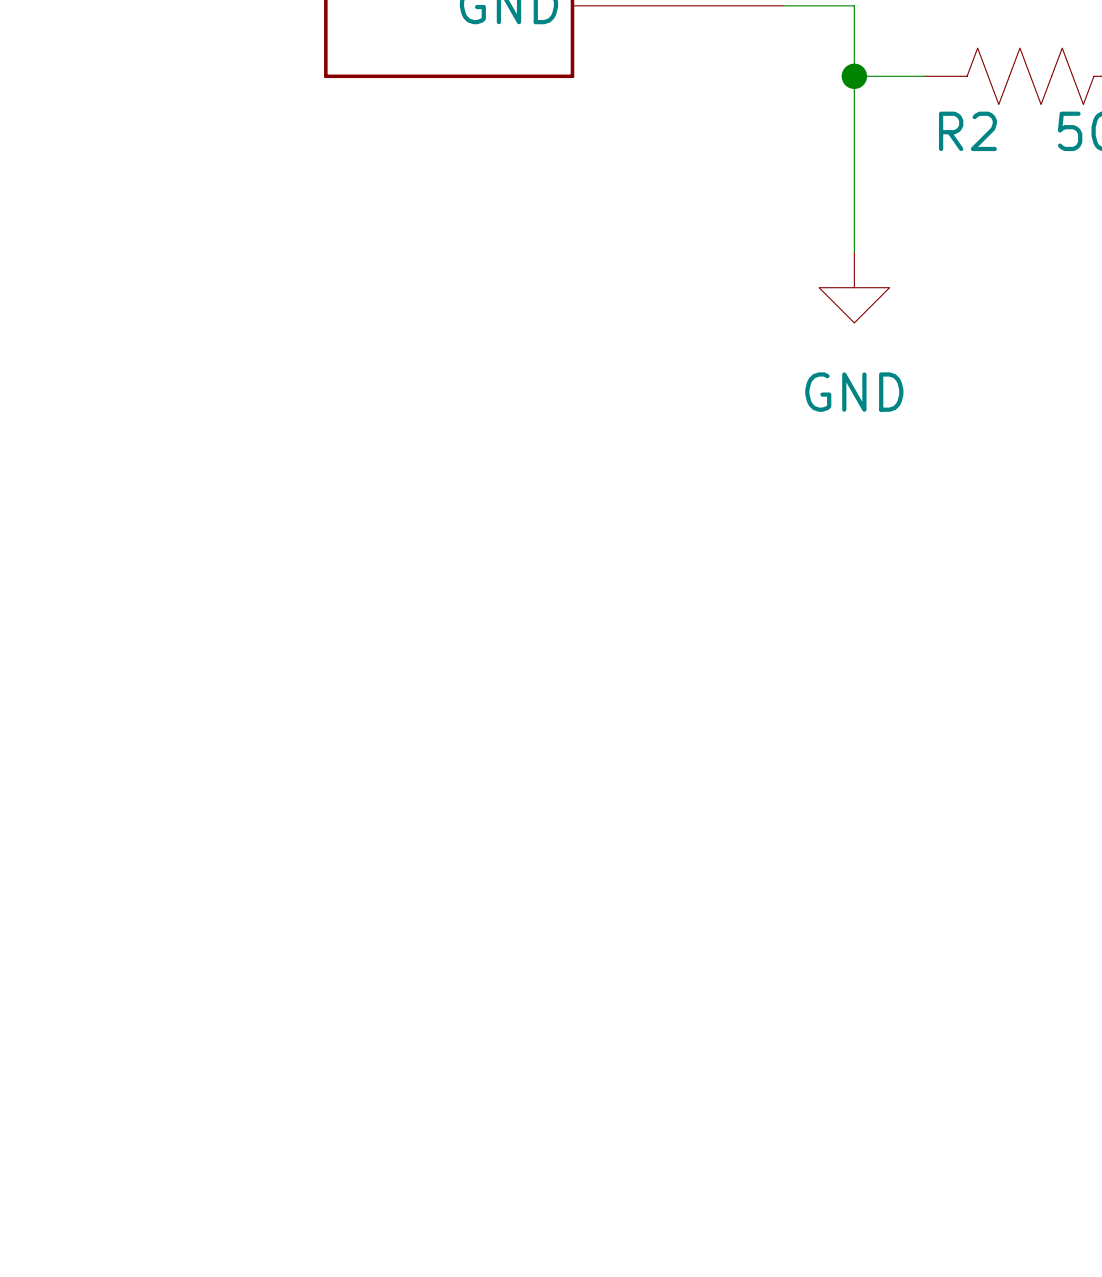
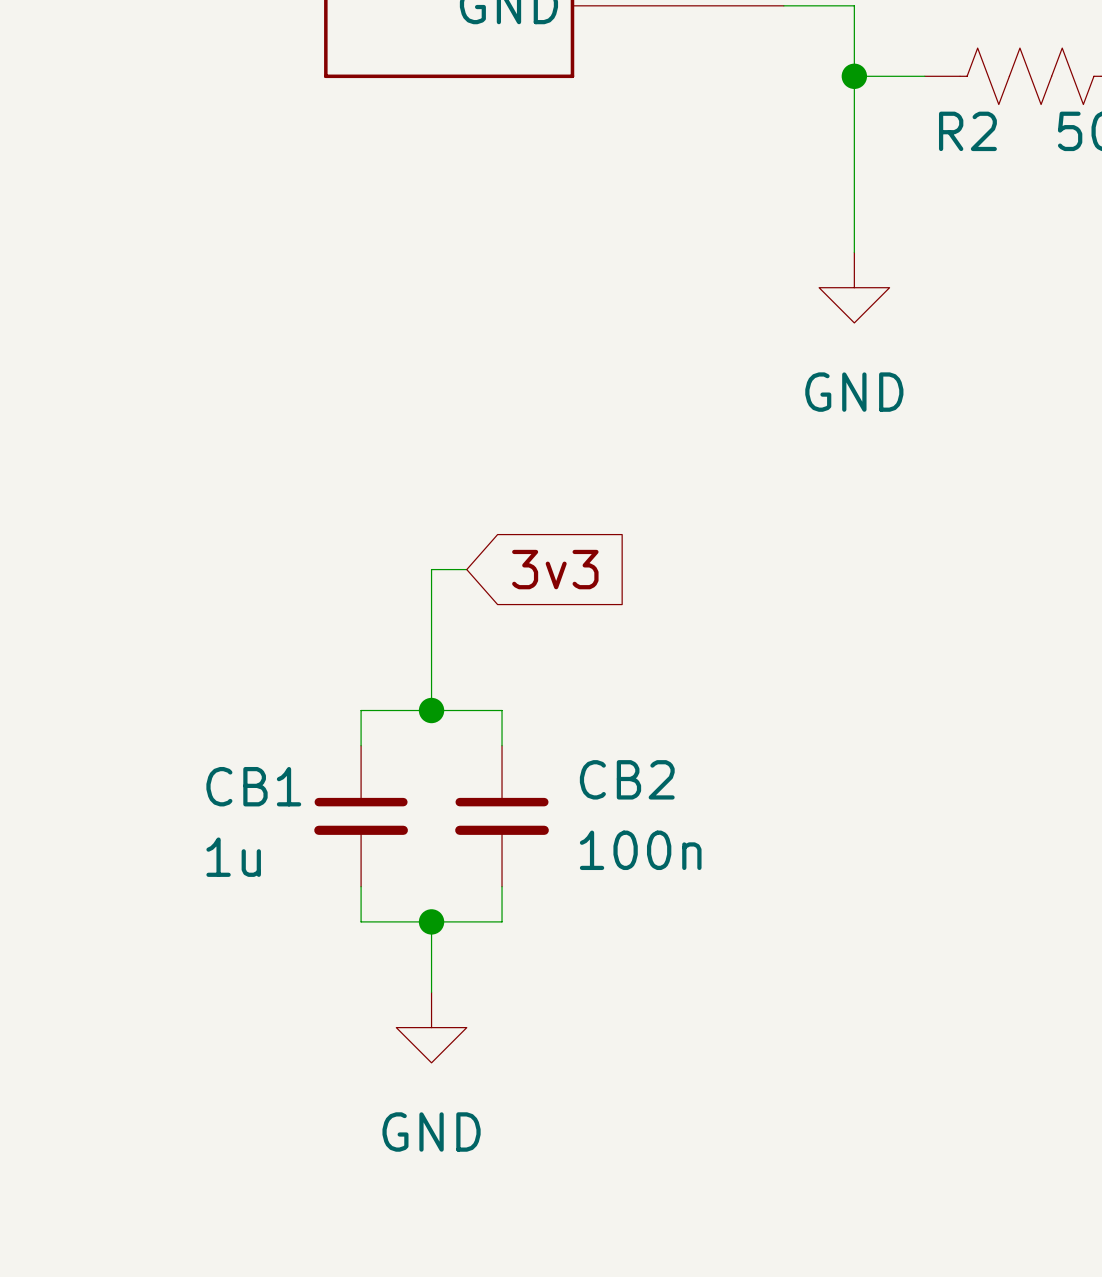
wire: none -> (466, 569) (431, 569) (431, 710)
global label: none -> 3v3 (555, 569)
junction: none -> (431, 710)
wire: none -> (361, 745) (361, 710) (502, 710) (502, 745)
CB1: none -> 1u (361, 816)
CB2: none -> 100n (502, 816)
wire: none -> (361, 886) (361, 921) (502, 921) (502, 886)
wire: none -> (431, 921) (431, 992)
junction: none -> (431, 921)
power symbol: none -> GND (431, 1027)

